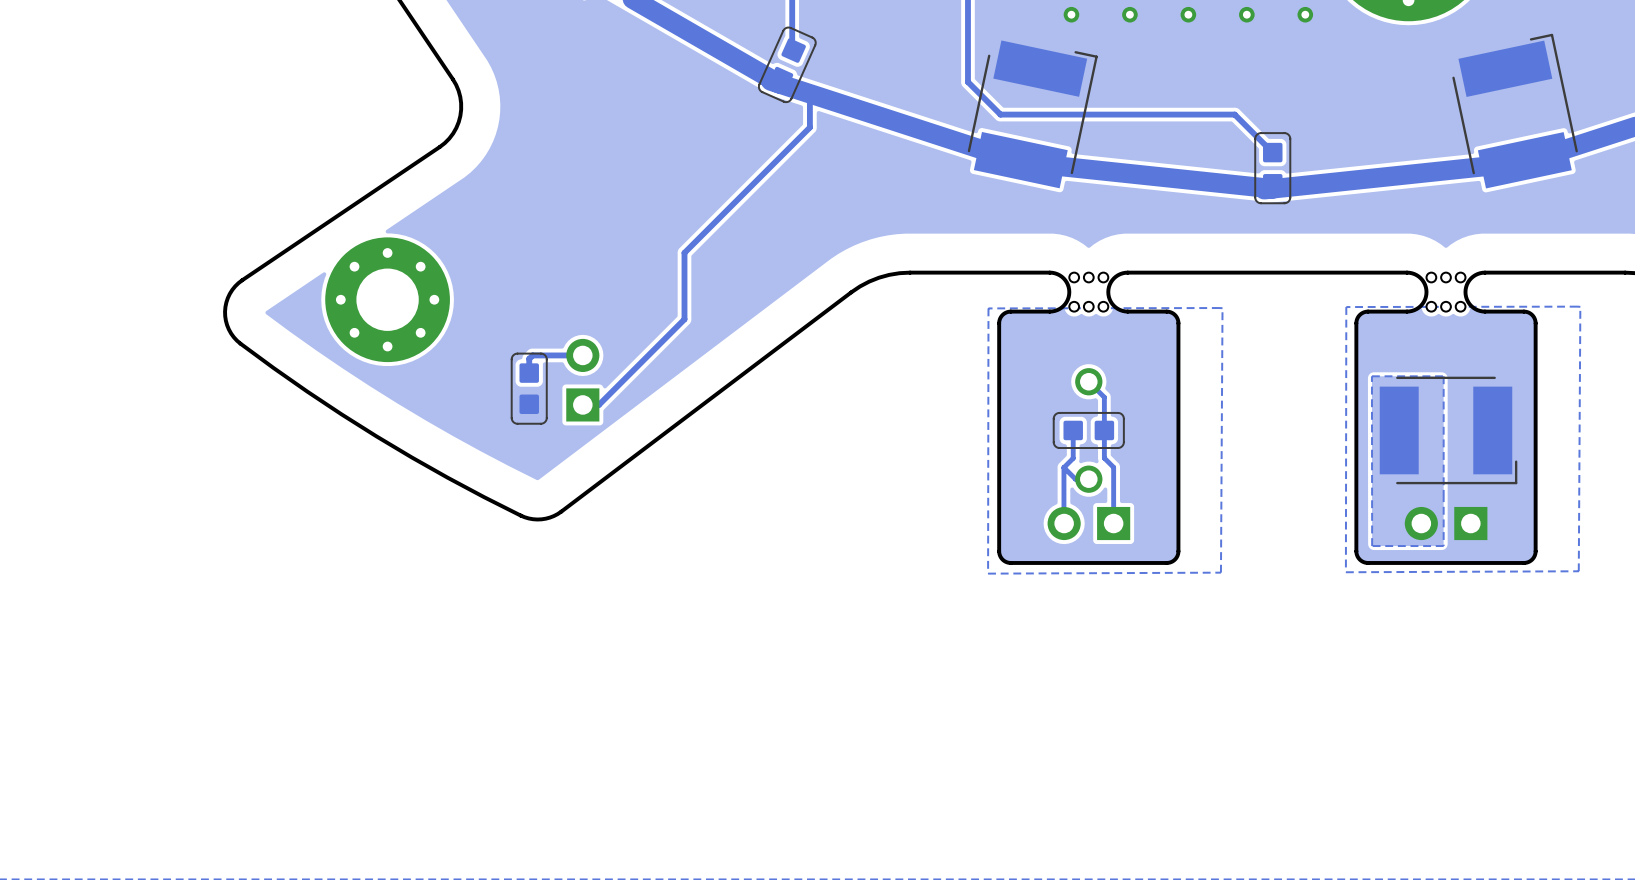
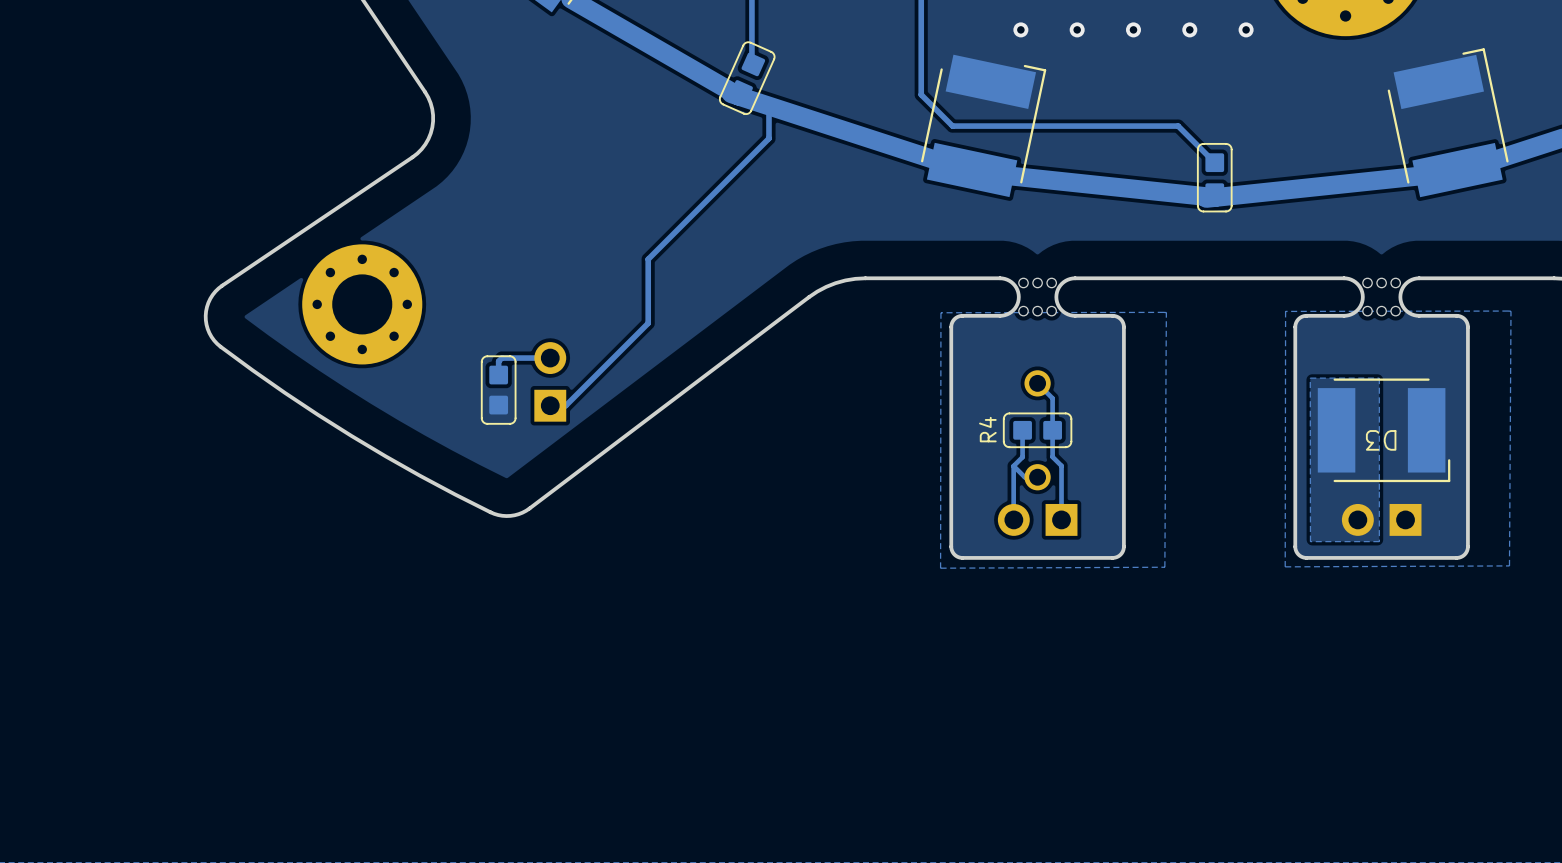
R4 name: none -> R4 (987, 429)
D3 name: none -> D3 (1381, 440)

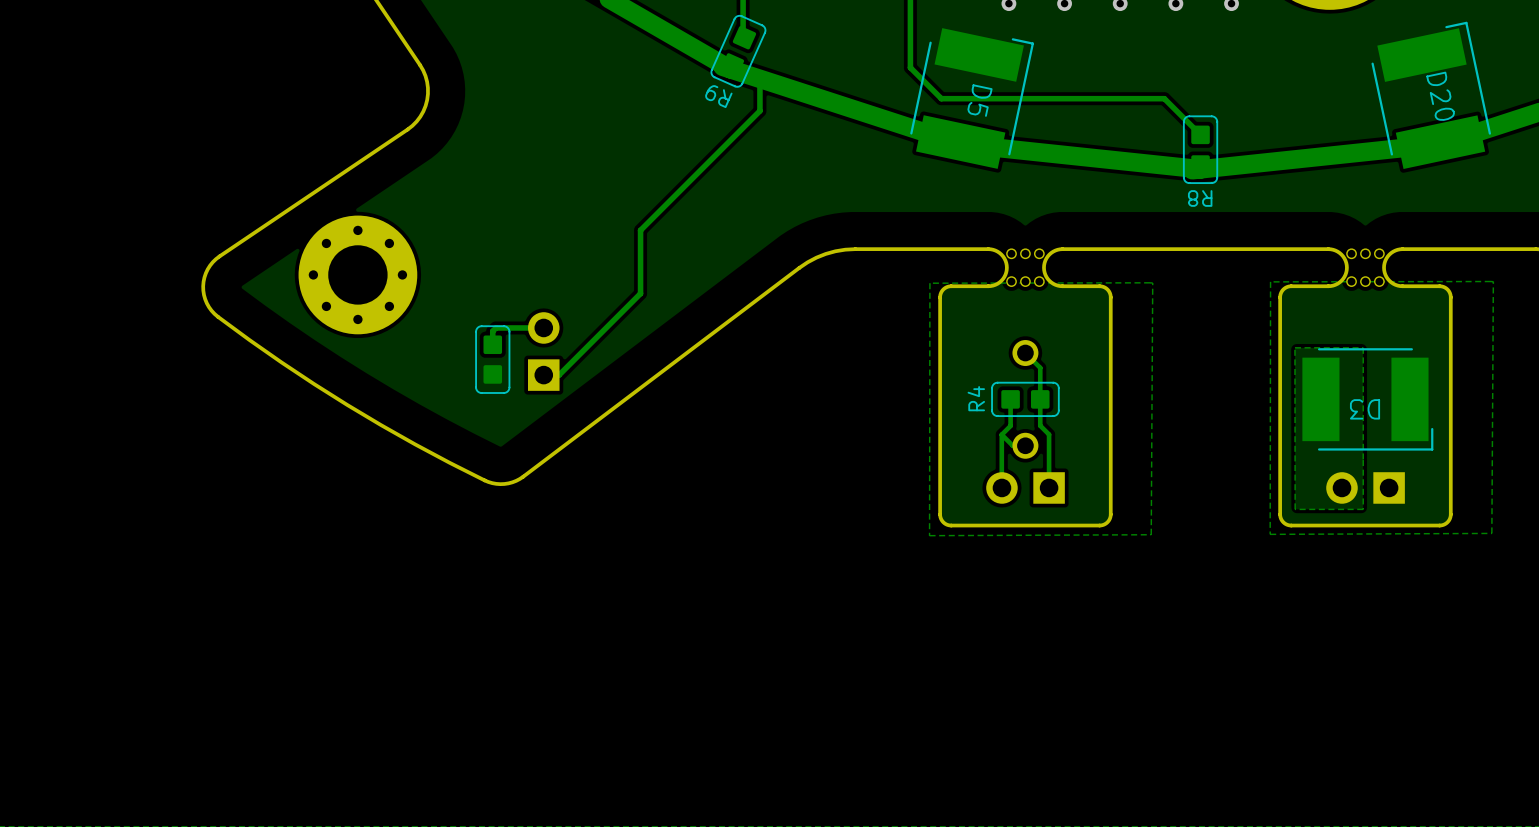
R9 name: none -> R9 (718, 96)
D20 name: none -> D20 (1440, 96)
D5 name: none -> D5 (979, 100)
R8 name: none -> R8 (1200, 198)

